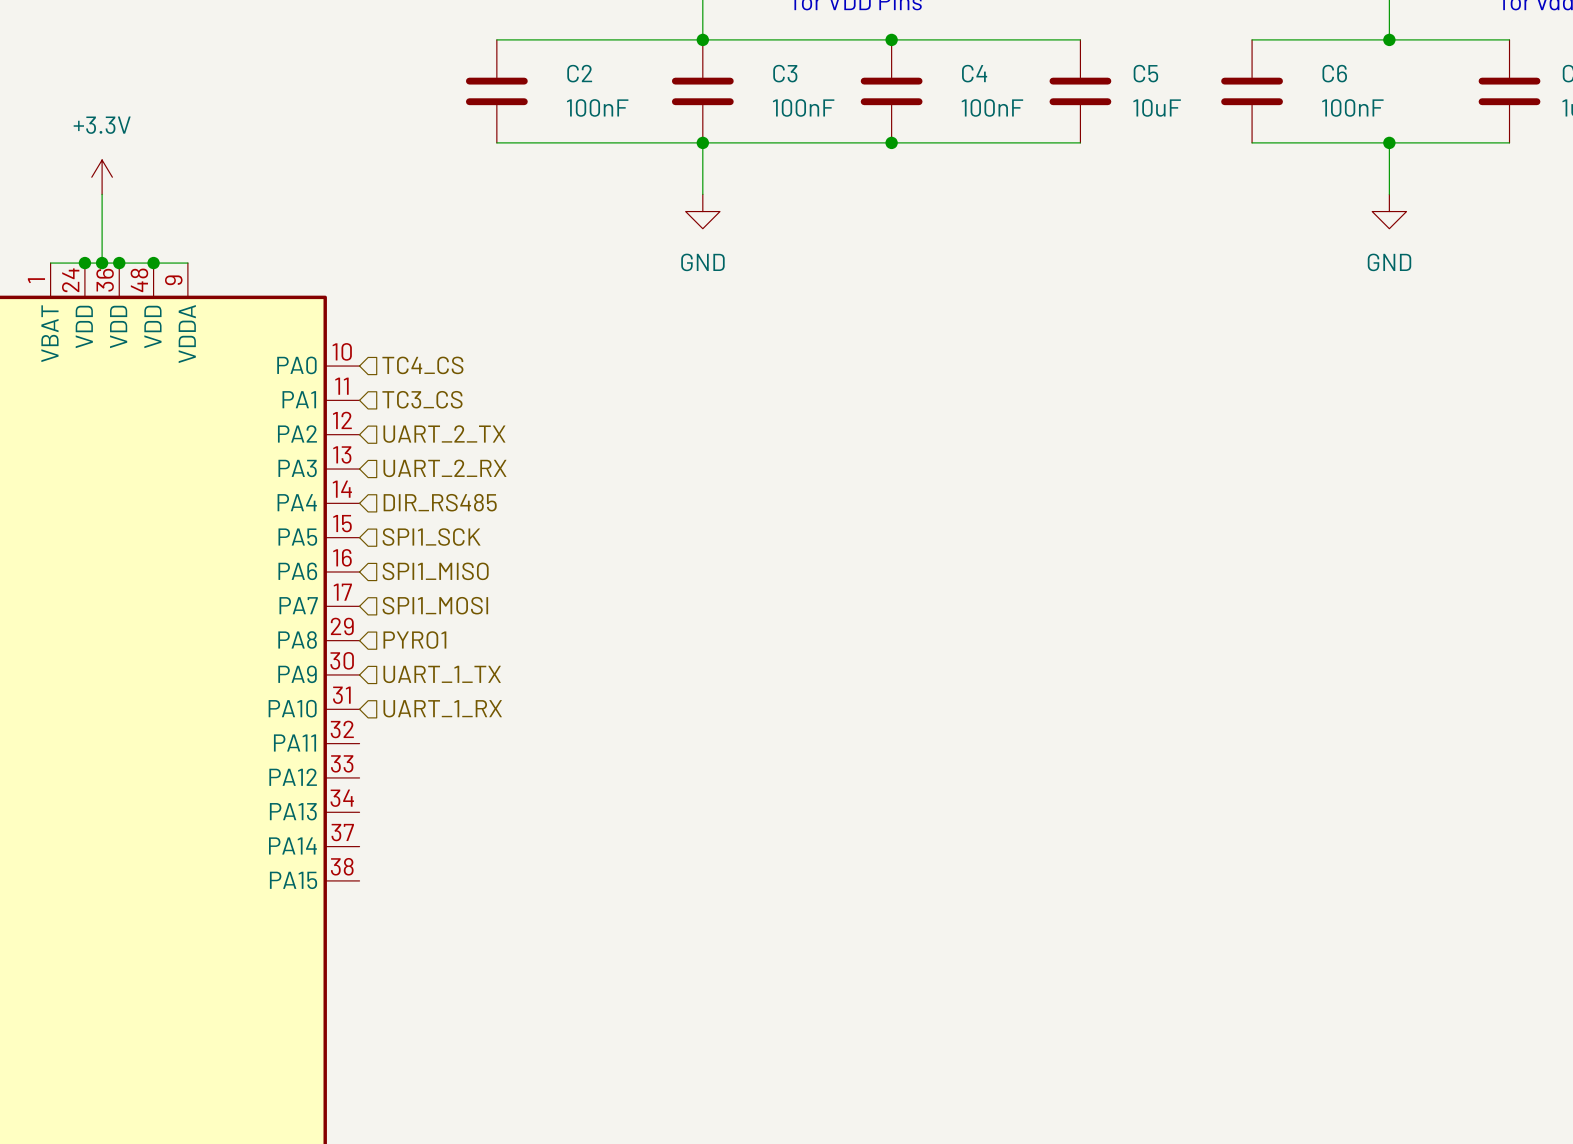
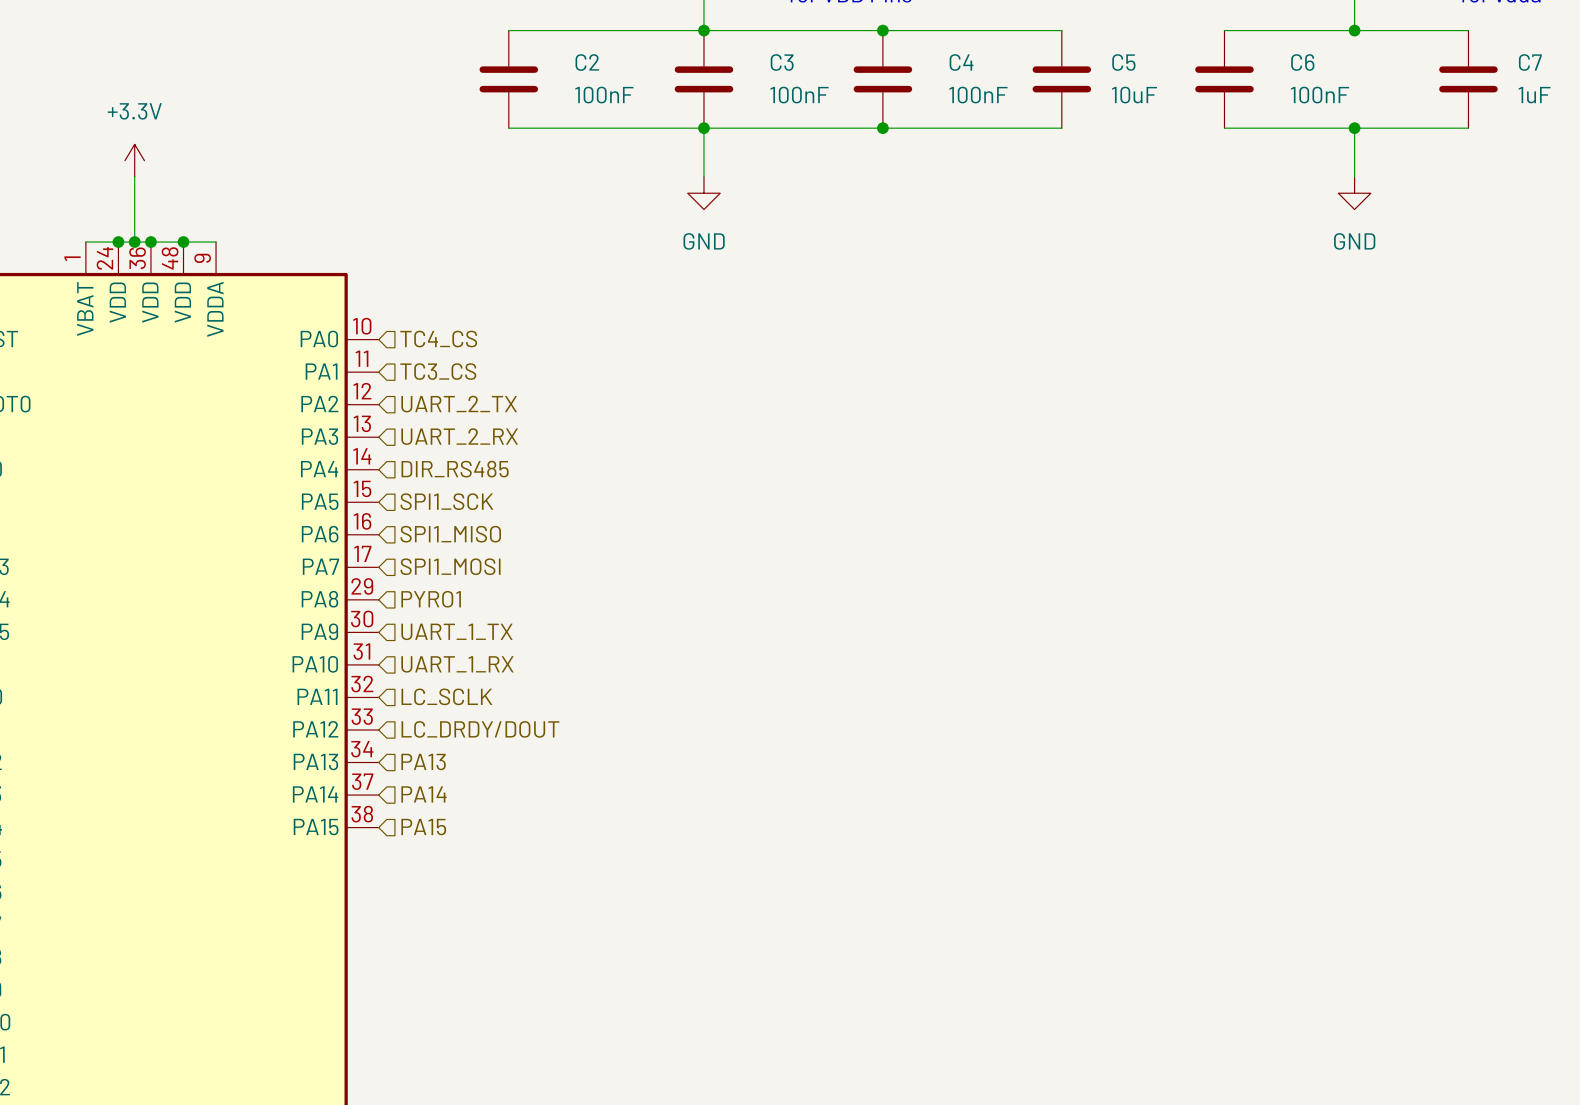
hierarchical label: none -> LC_SCLK (446, 696)
hierarchical label: none -> LC_DRDY/DOUT (480, 729)
hierarchical label: none -> PA13 (423, 761)
hierarchical label: none -> PA14 (424, 794)
hierarchical label: none -> PA15 (423, 827)

